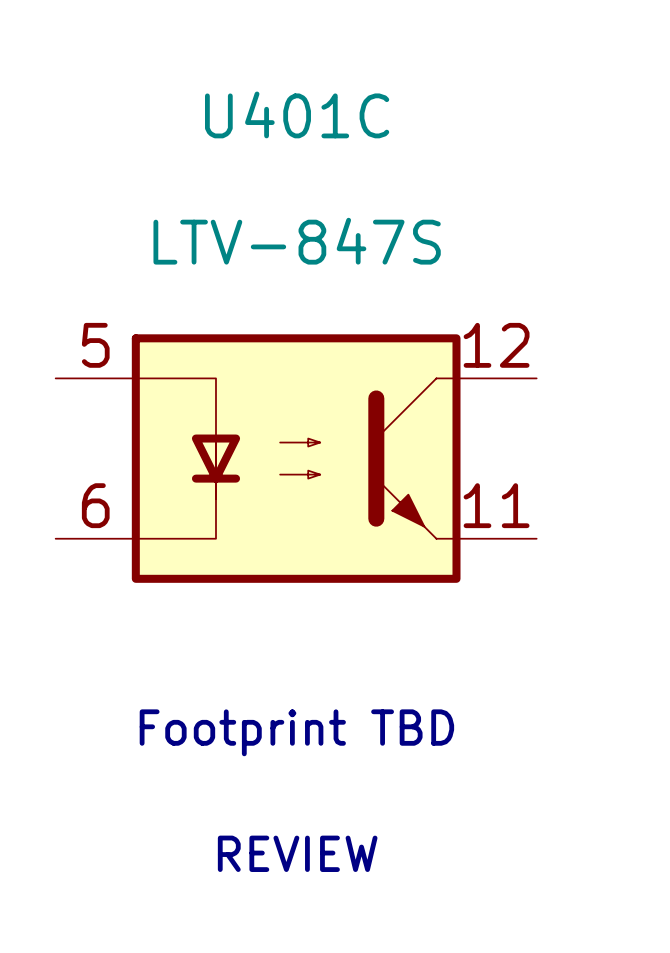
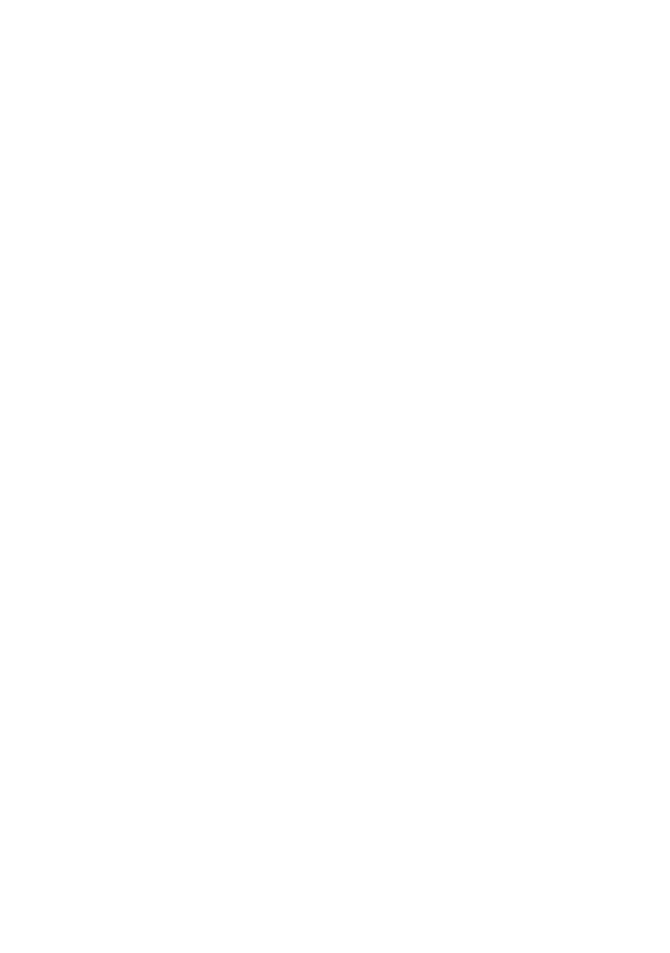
U401C: LTV-847S (296, 458) -> none
text: Footprint TBD (296, 732) -> none
text: REVIEW (297, 853) -> none

